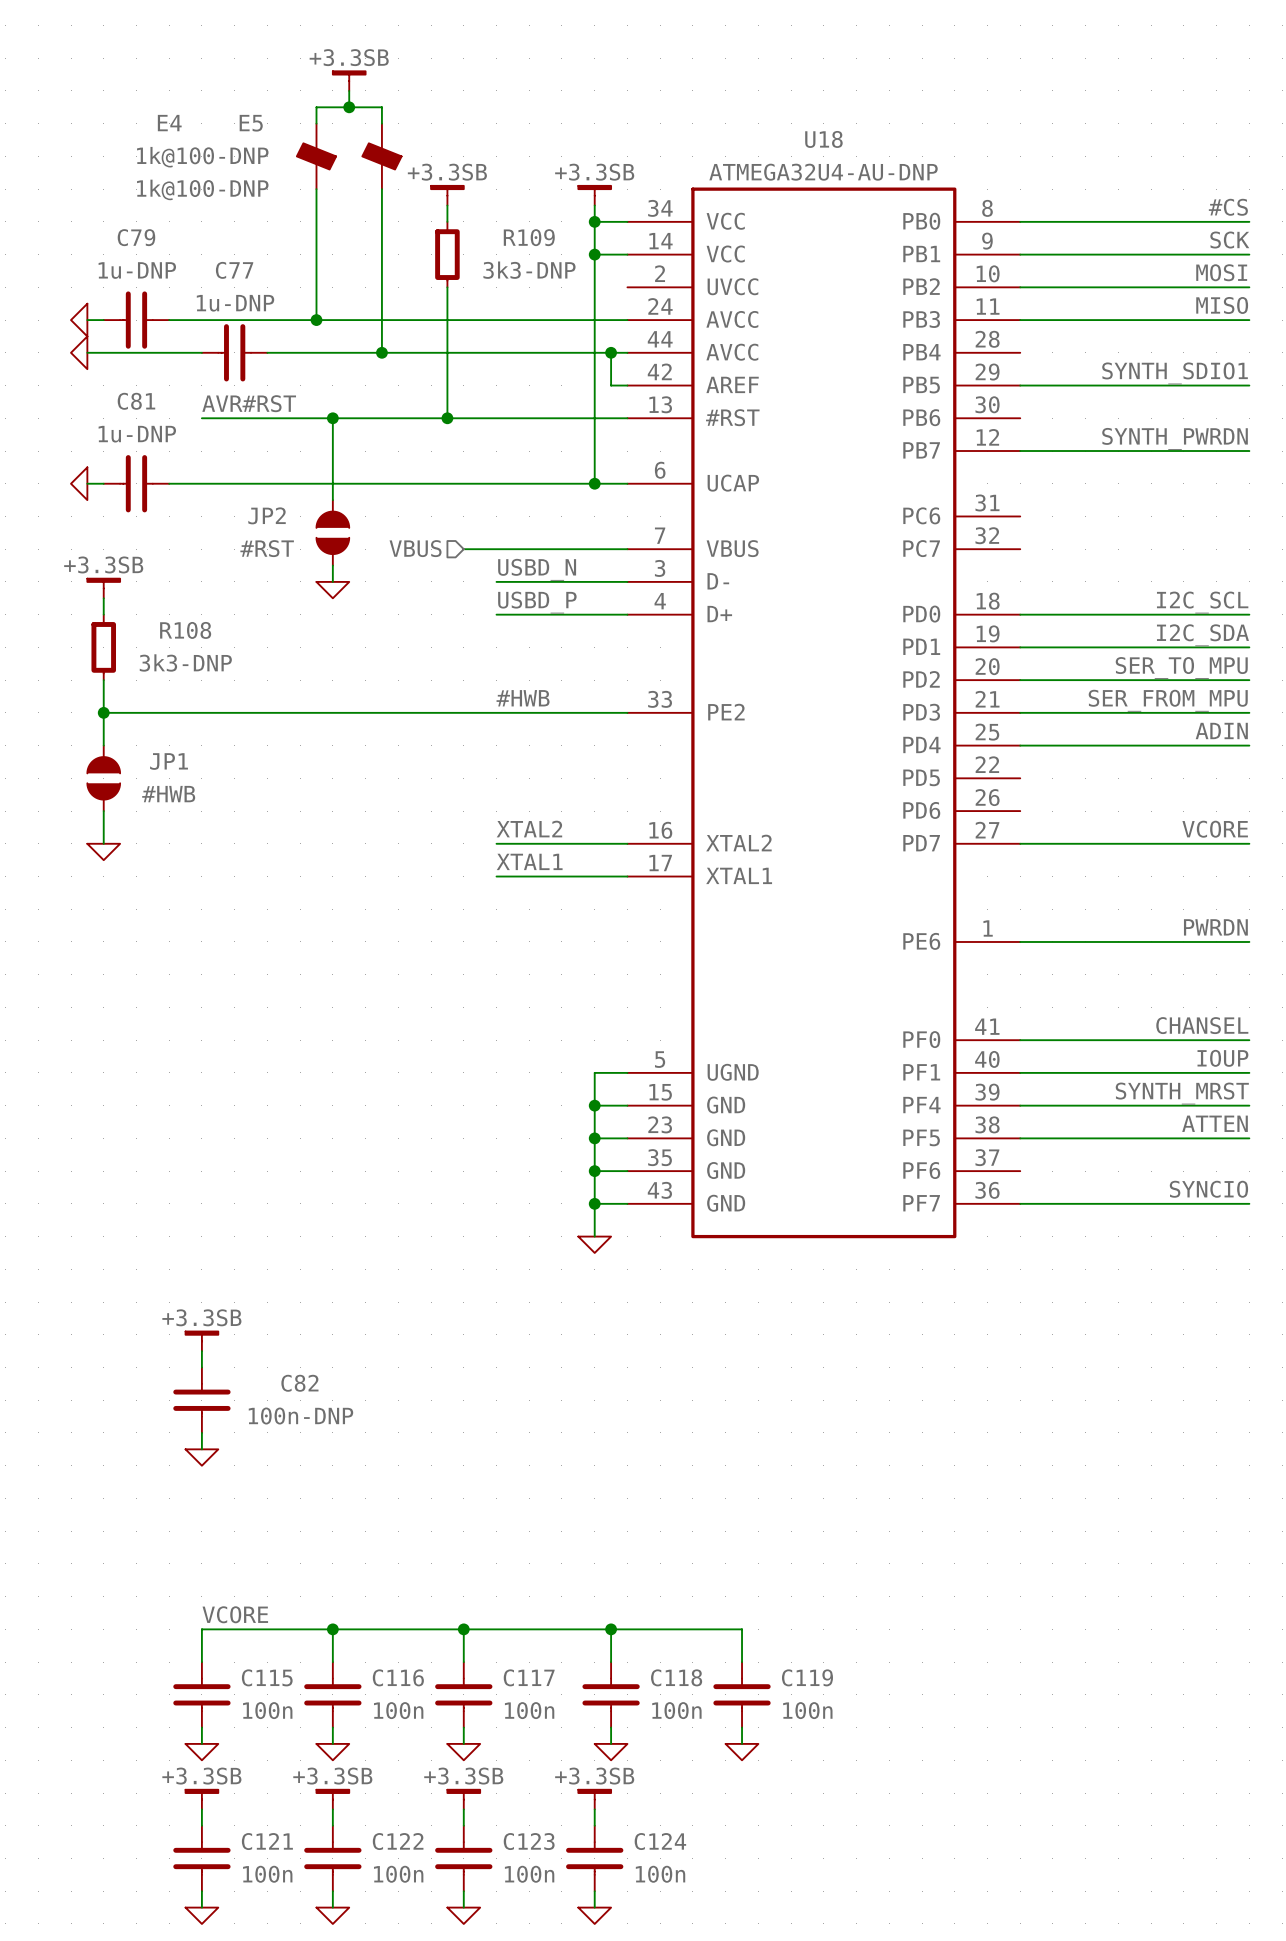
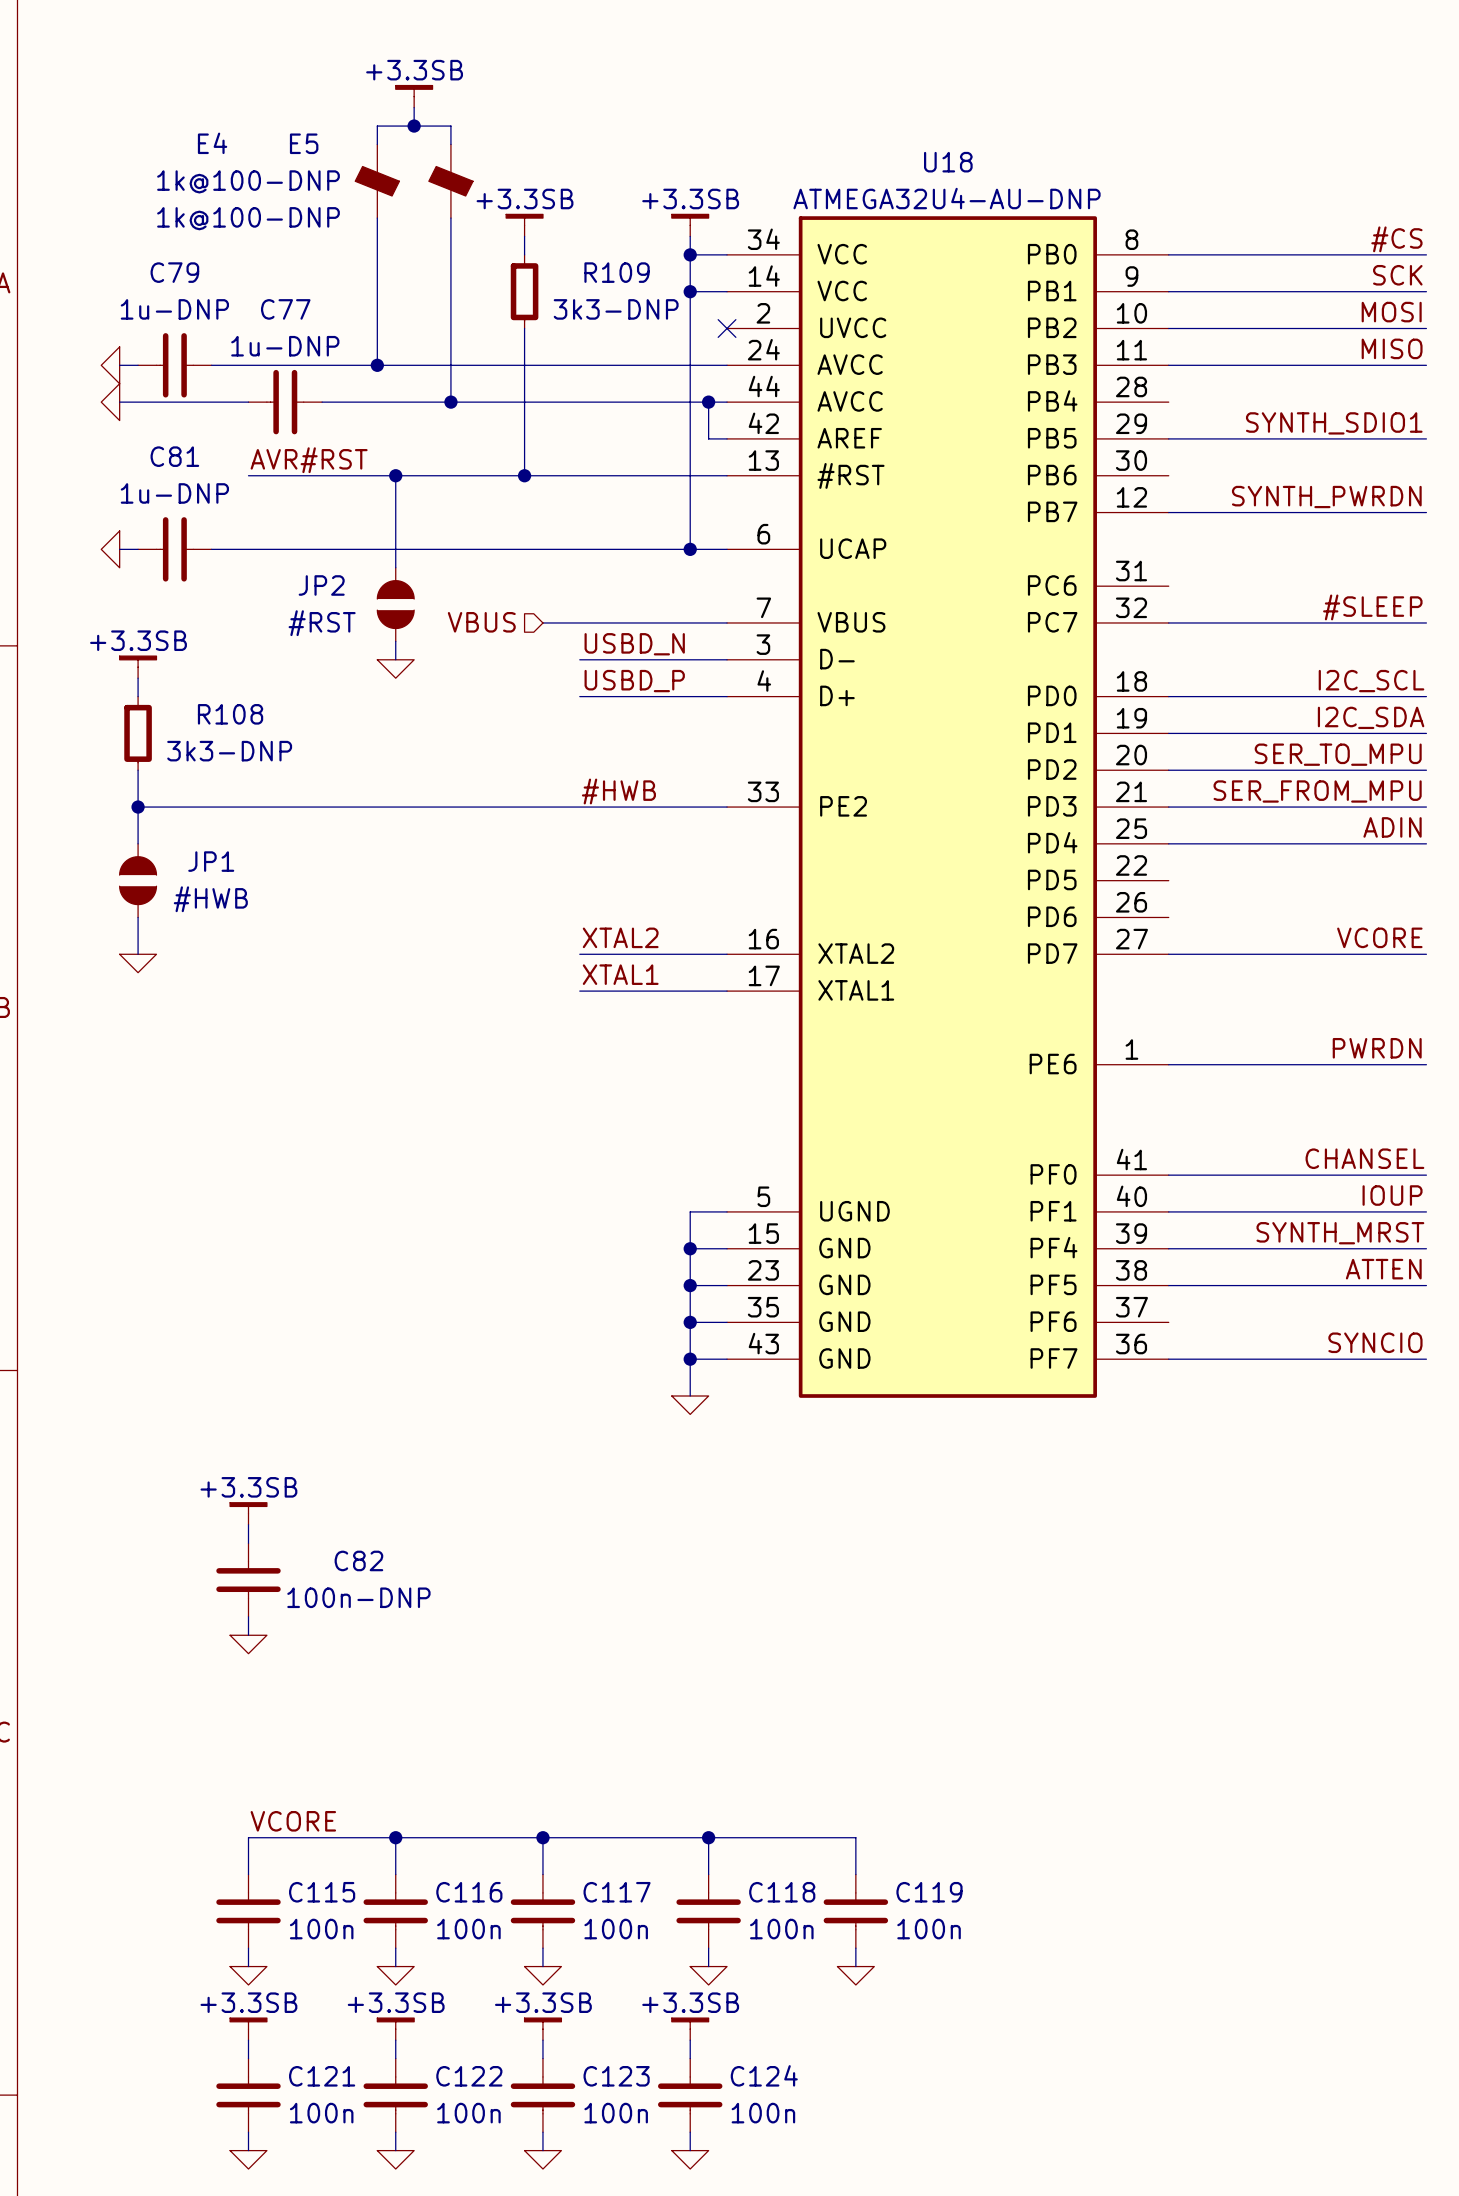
no-connect mark: none -> (727, 328)
label: none -> #SLEEP (1372, 607)
wire: none -> (1168, 622) (1426, 622)

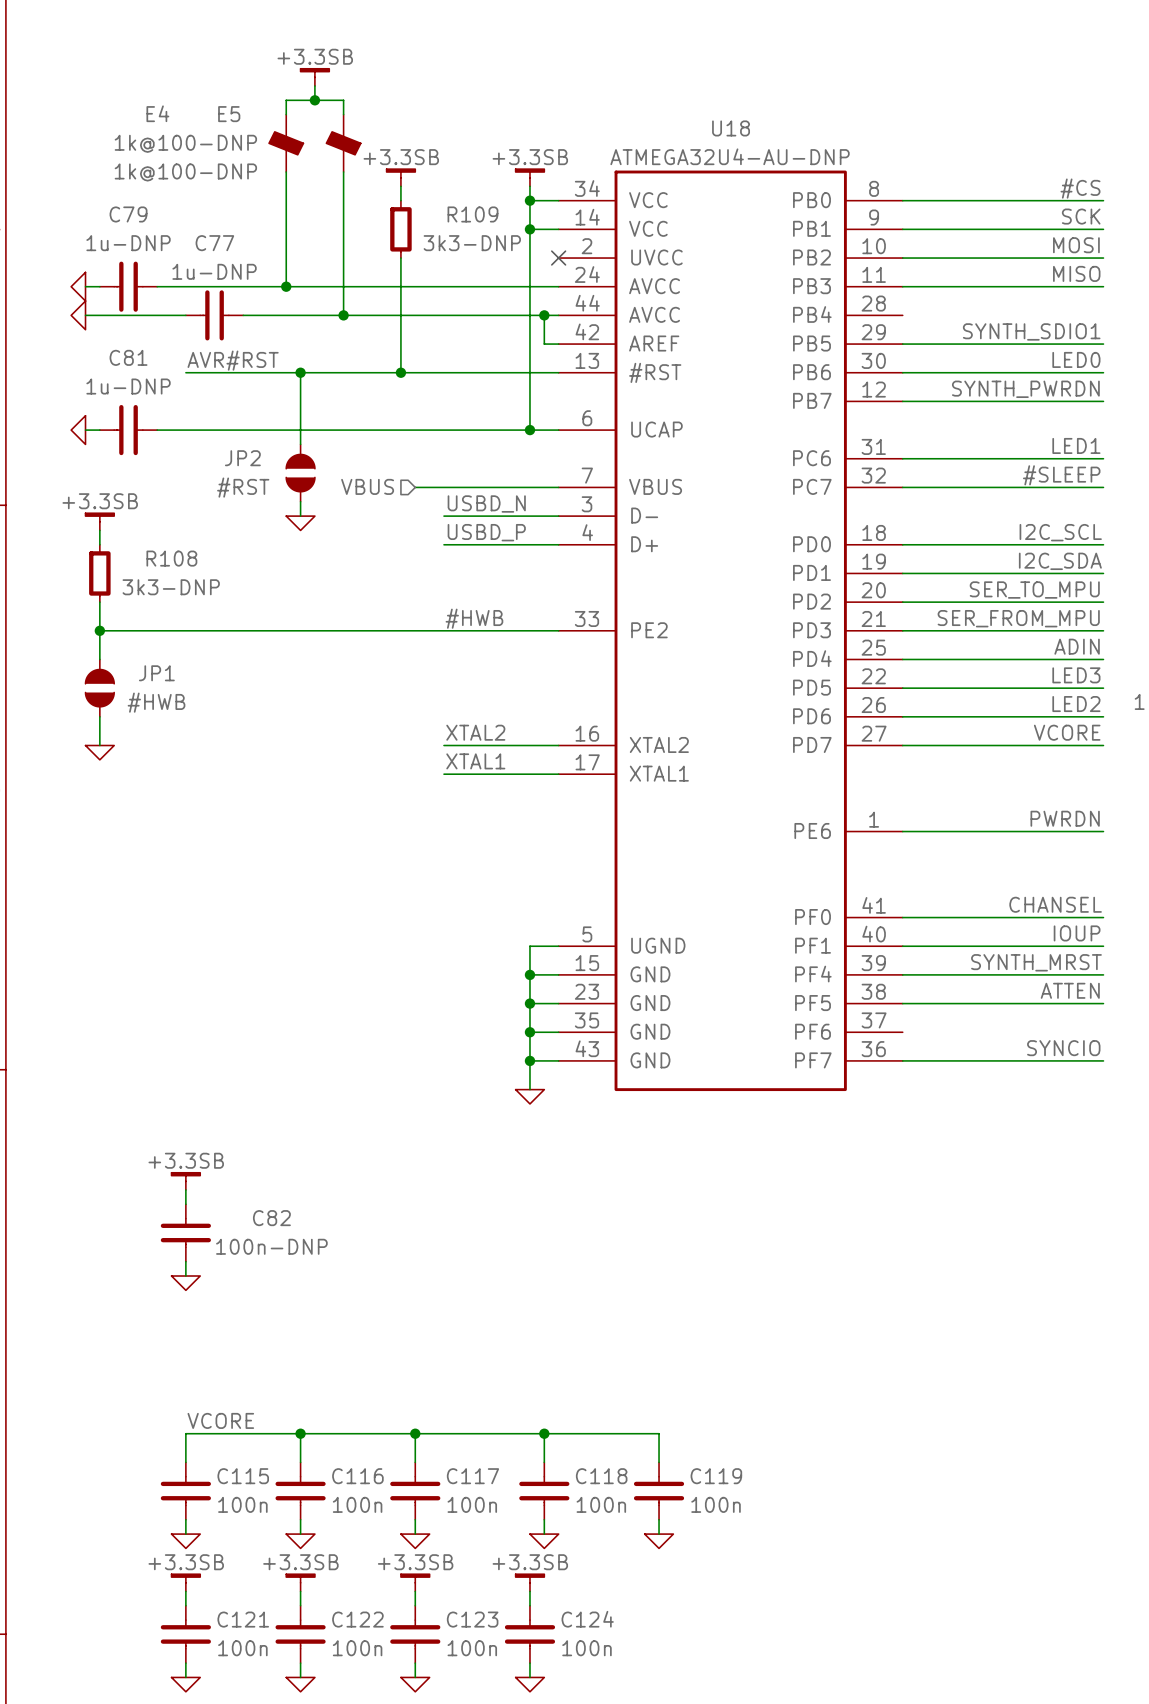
label: none -> LED0 (1076, 359)
wire: none -> (902, 372) (1103, 372)
label: none -> LED1 (1076, 445)
wire: none -> (902, 458) (1103, 458)
label: none -> LED3 (1076, 675)
wire: none -> (902, 688) (1103, 688)
label: none -> LED2 (1076, 704)
wire: none -> (902, 716) (1103, 716)

